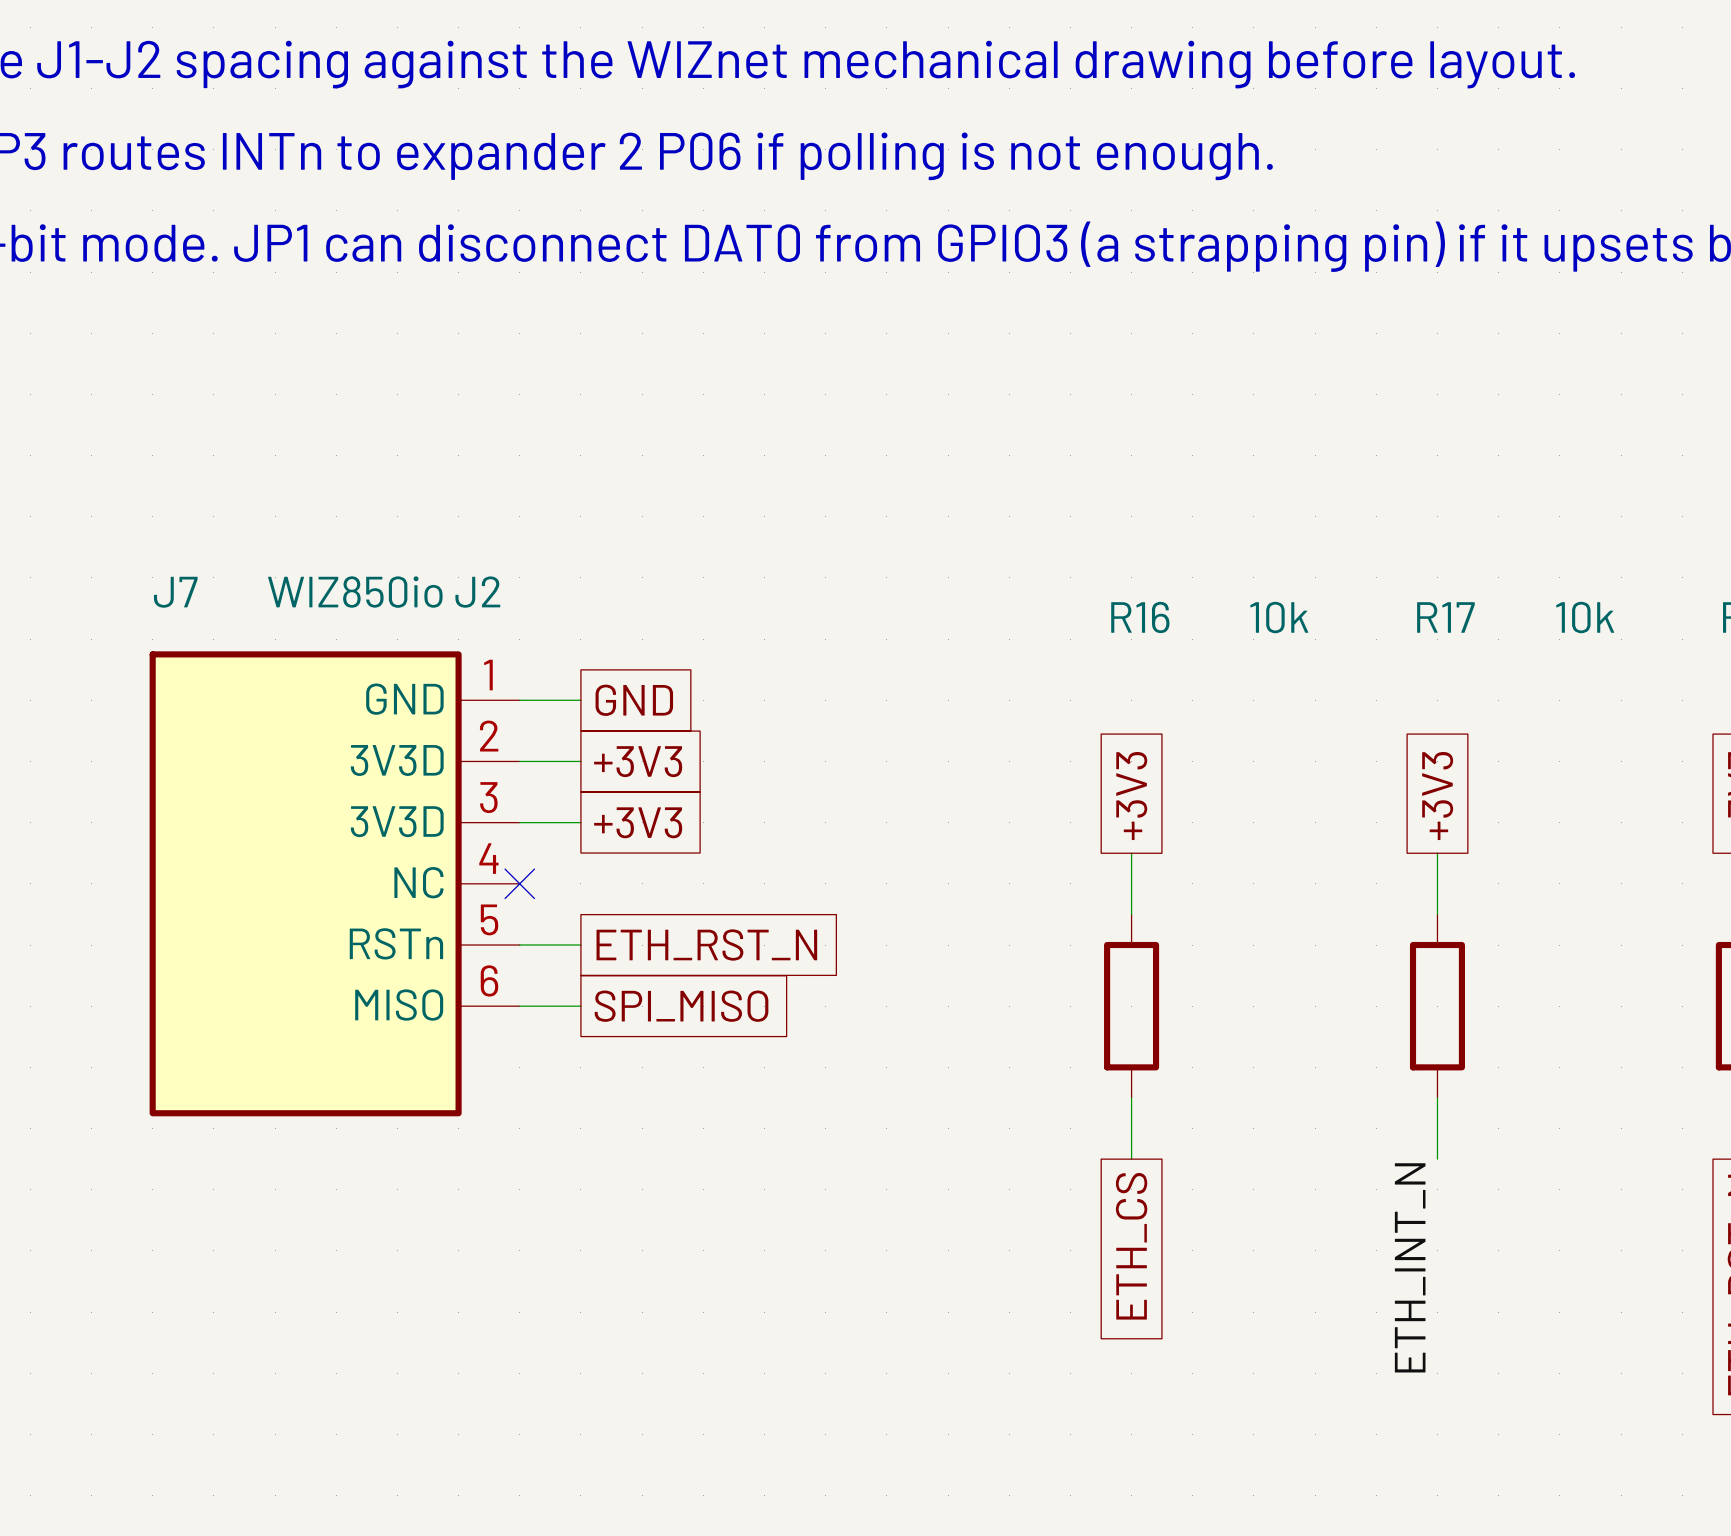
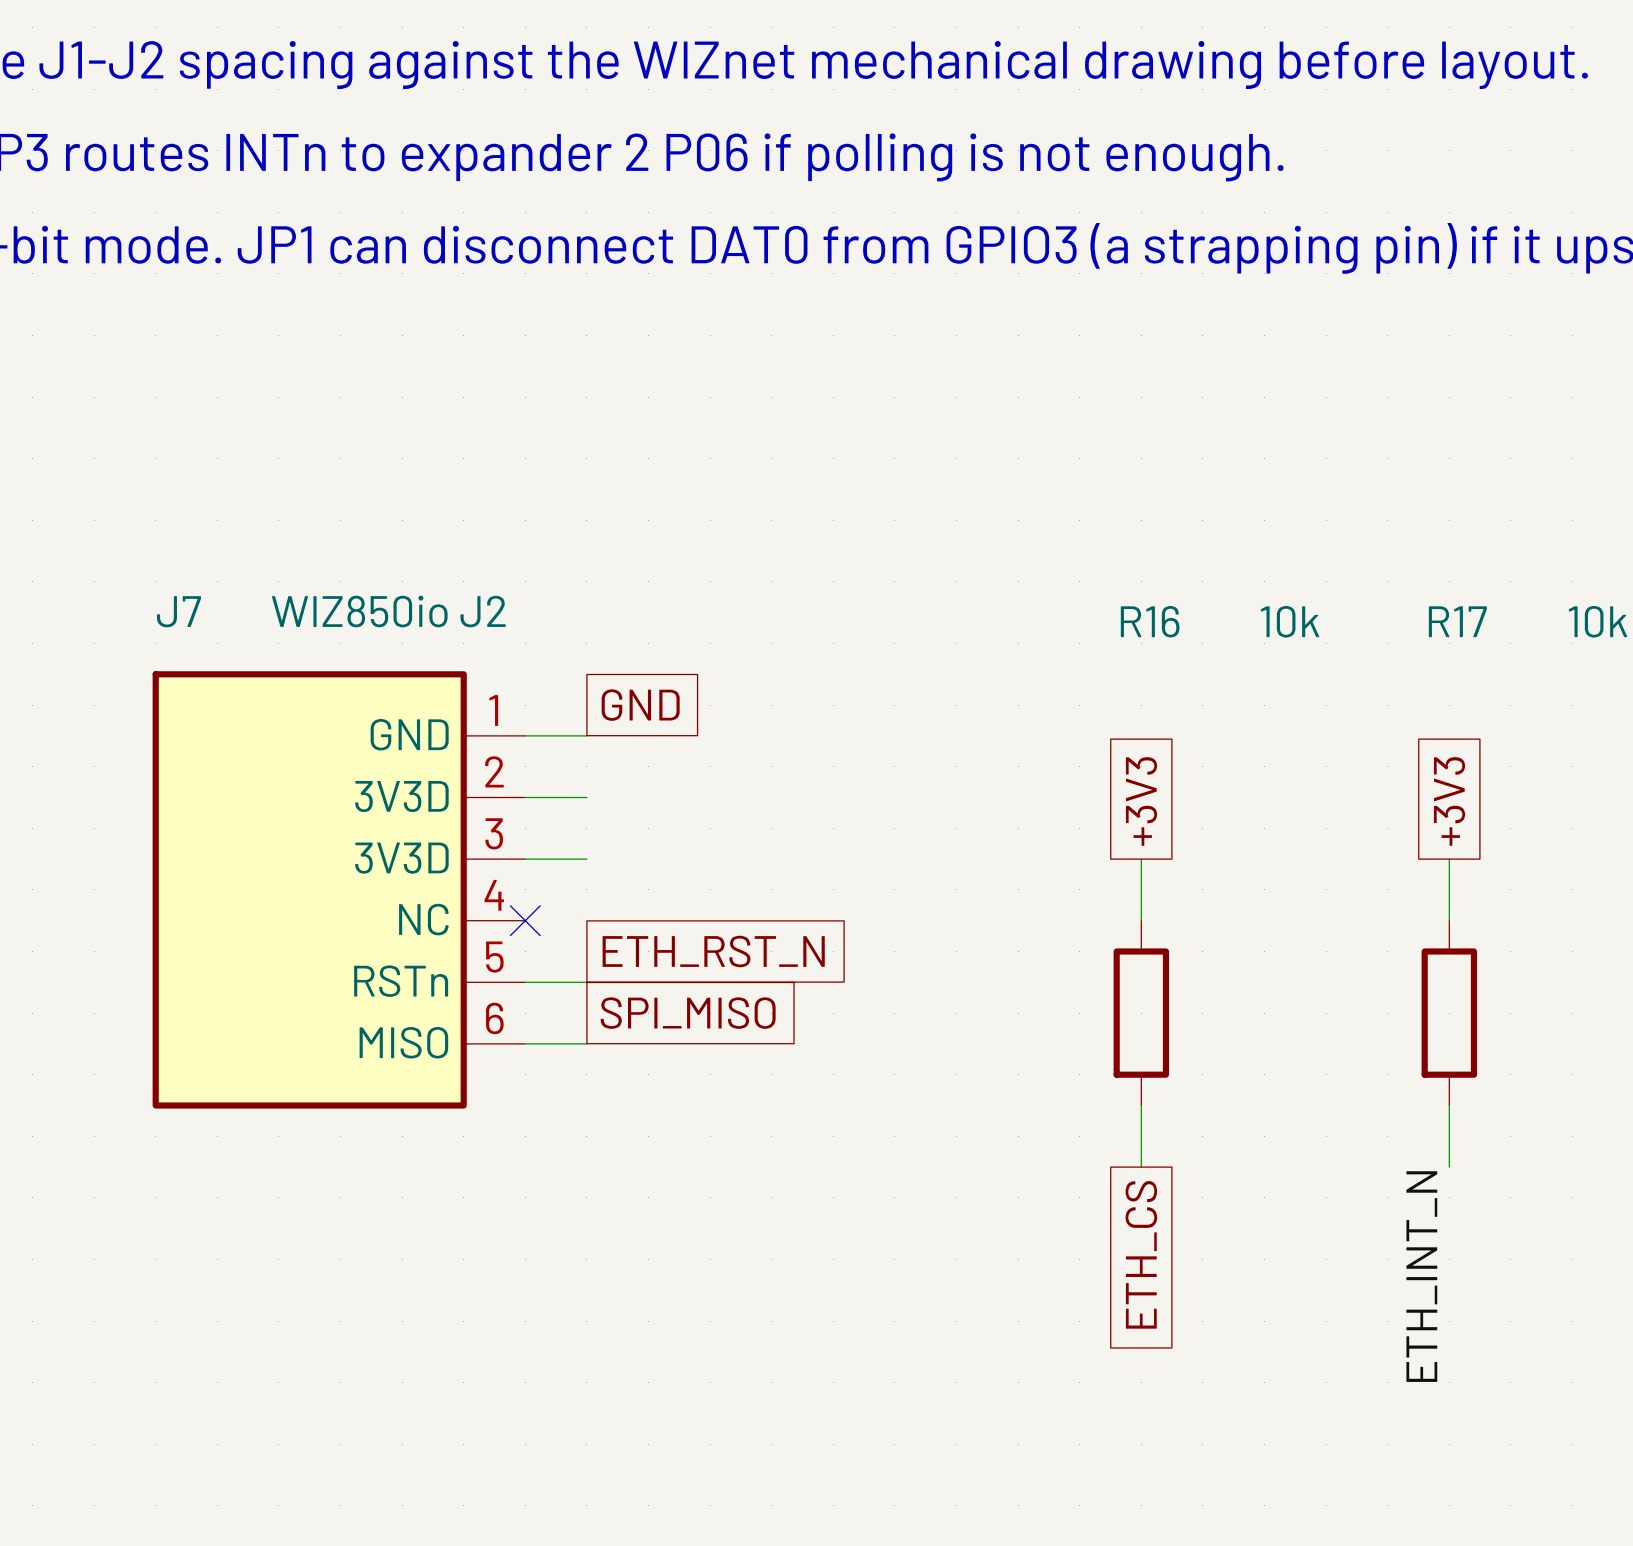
J7 symbol: [149, 651, 520, 1117] -> [152, 671, 526, 1109]
wire: (519, 700) (580, 700) -> (525, 735) (586, 735)
wire: (519, 761) (580, 761) -> (525, 797) (586, 797)
global label: +3V3 (638, 761) -> none
wire: (519, 822) (580, 822) -> (525, 859) (586, 859)
global label: +3V3 (638, 822) -> none
no-connect mark position: (519, 883) -> (525, 920)
wire: (519, 945) (580, 945) -> (525, 982) (586, 982)
wire: (519, 1006) (580, 1006) -> (525, 1043) (586, 1043)

